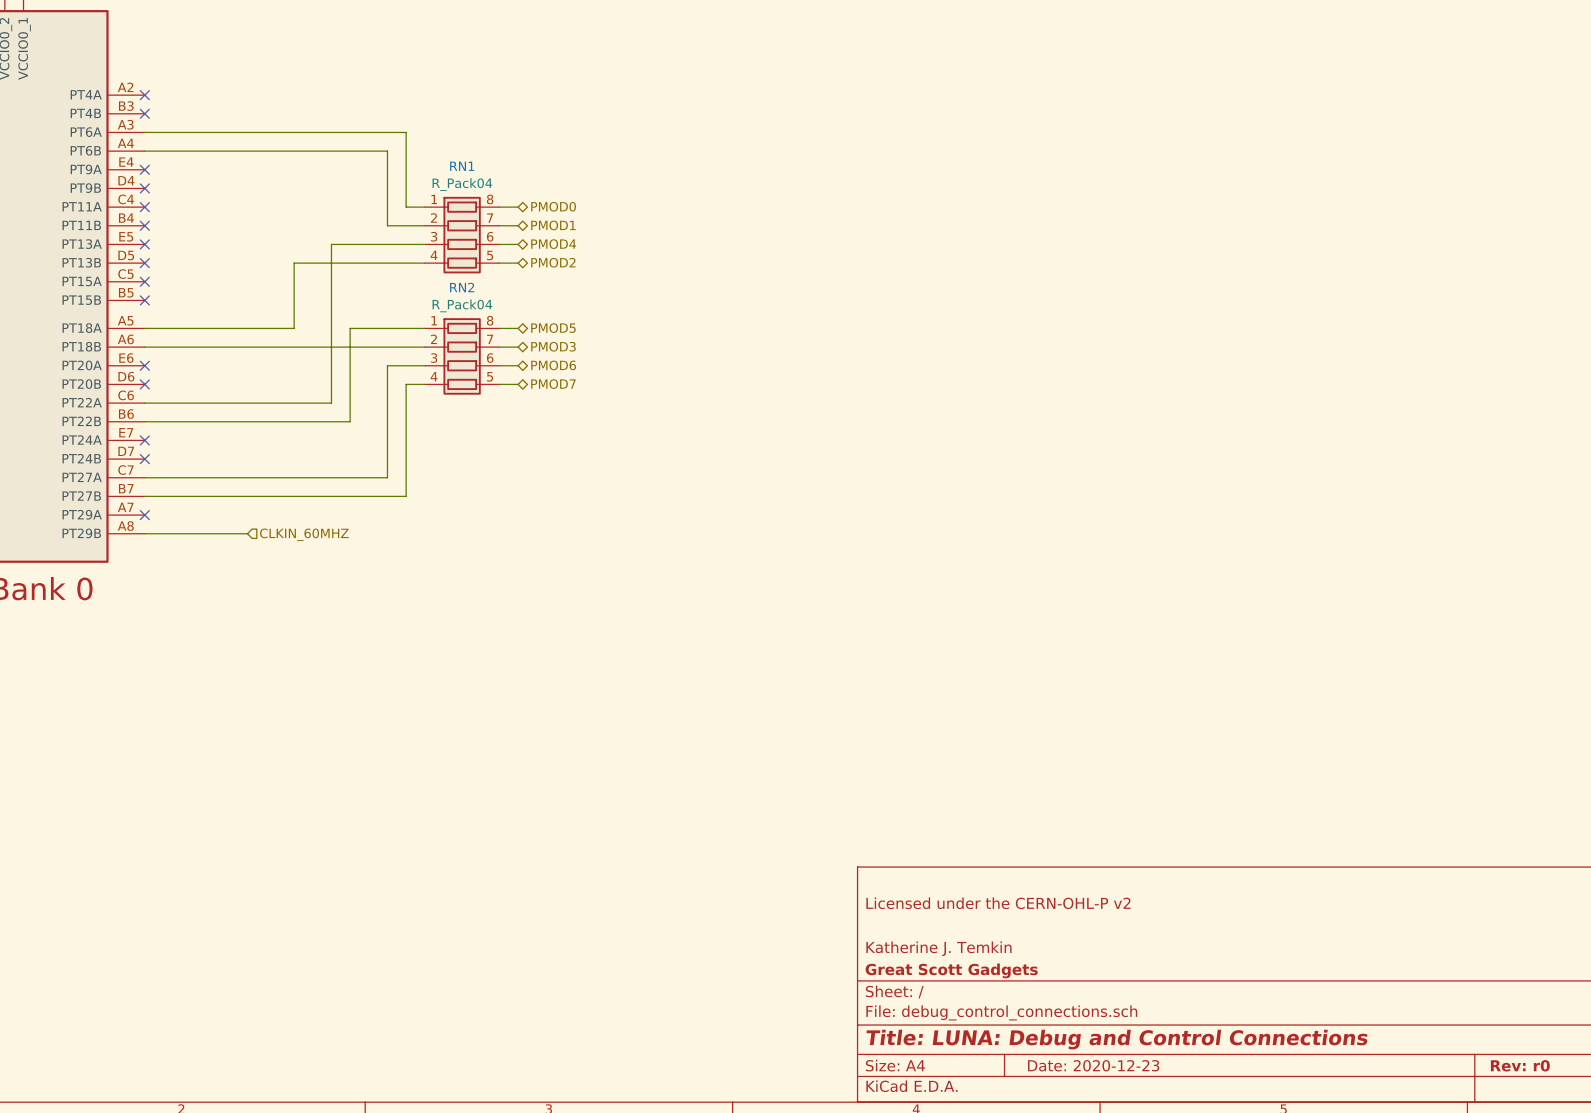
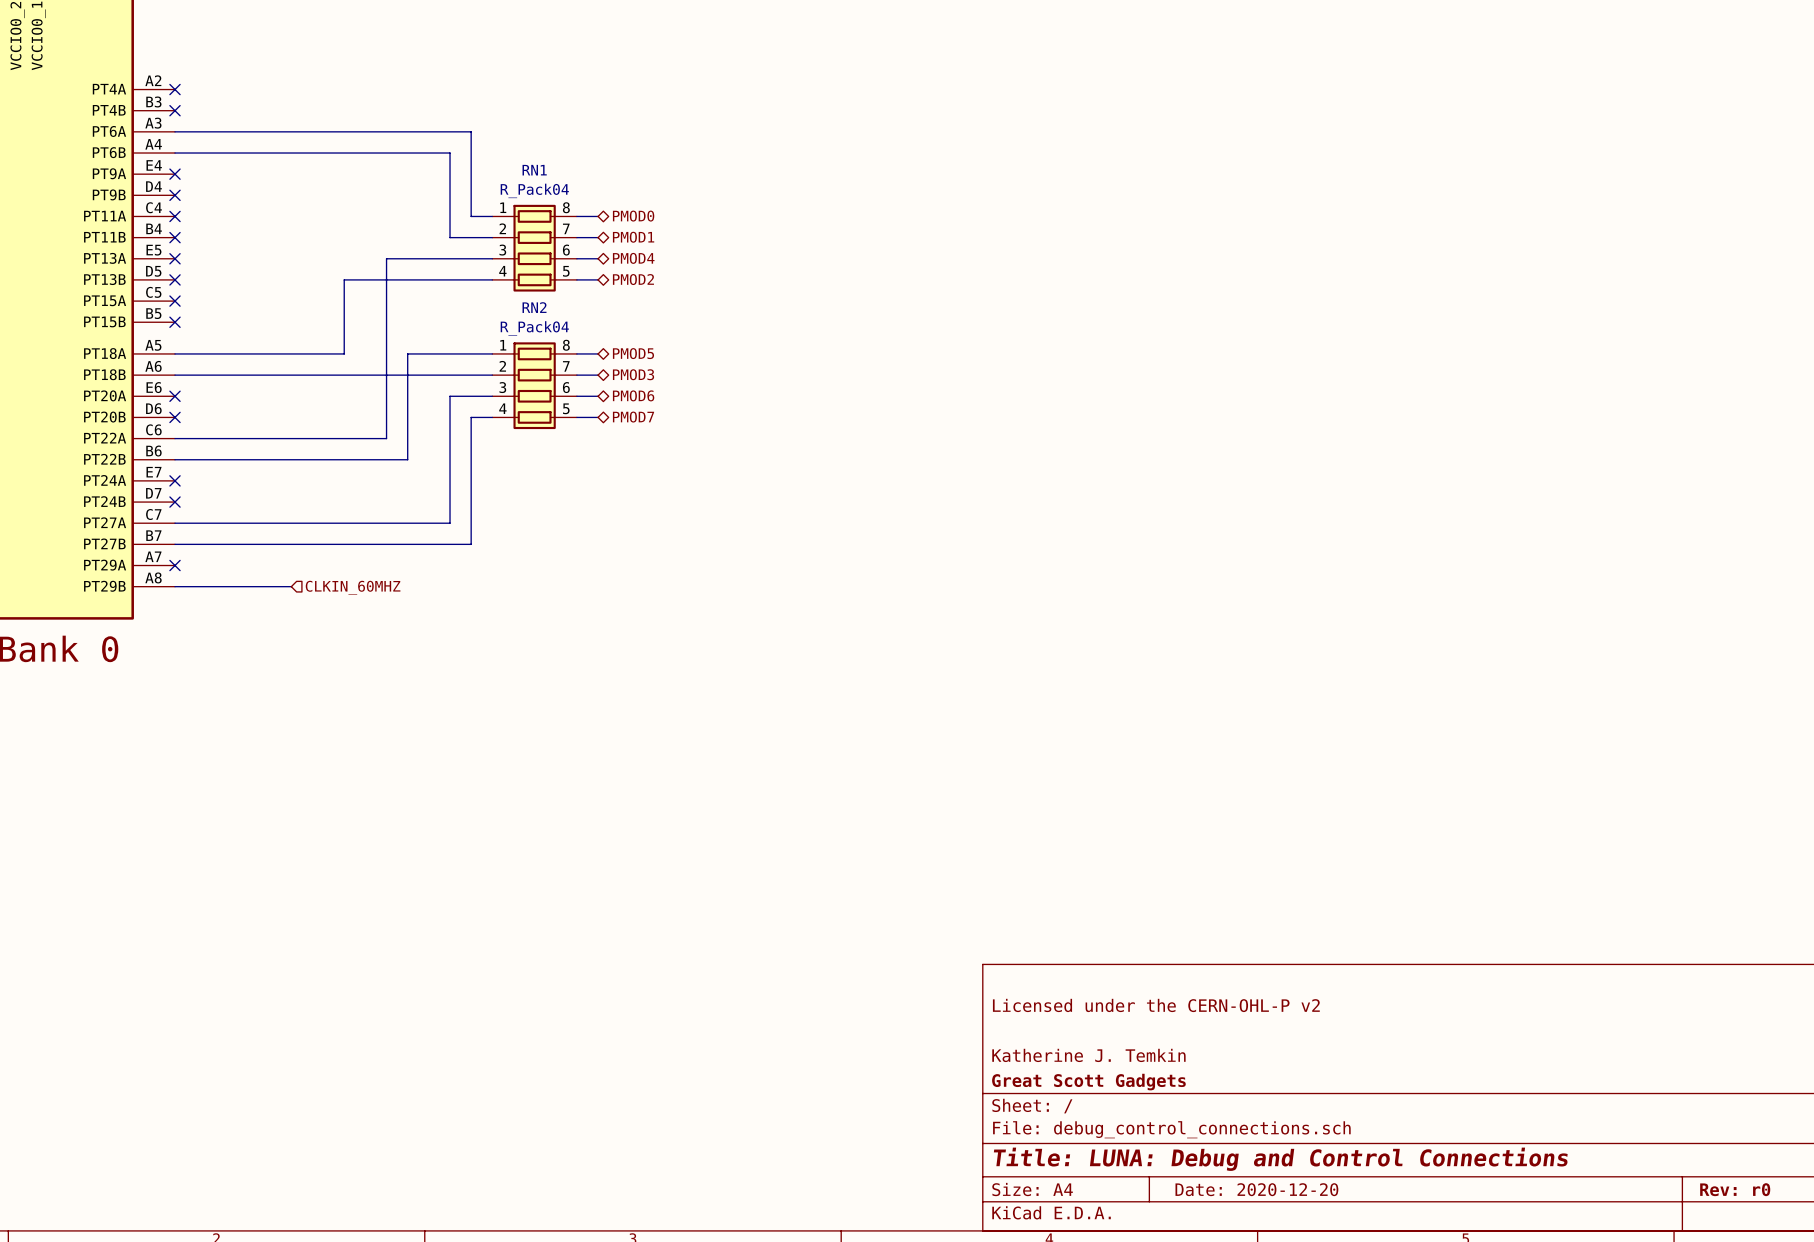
title block: Date: 2020-12-23 (1093, 1065) -> Date: 2020-12-20 (1256, 1189)

